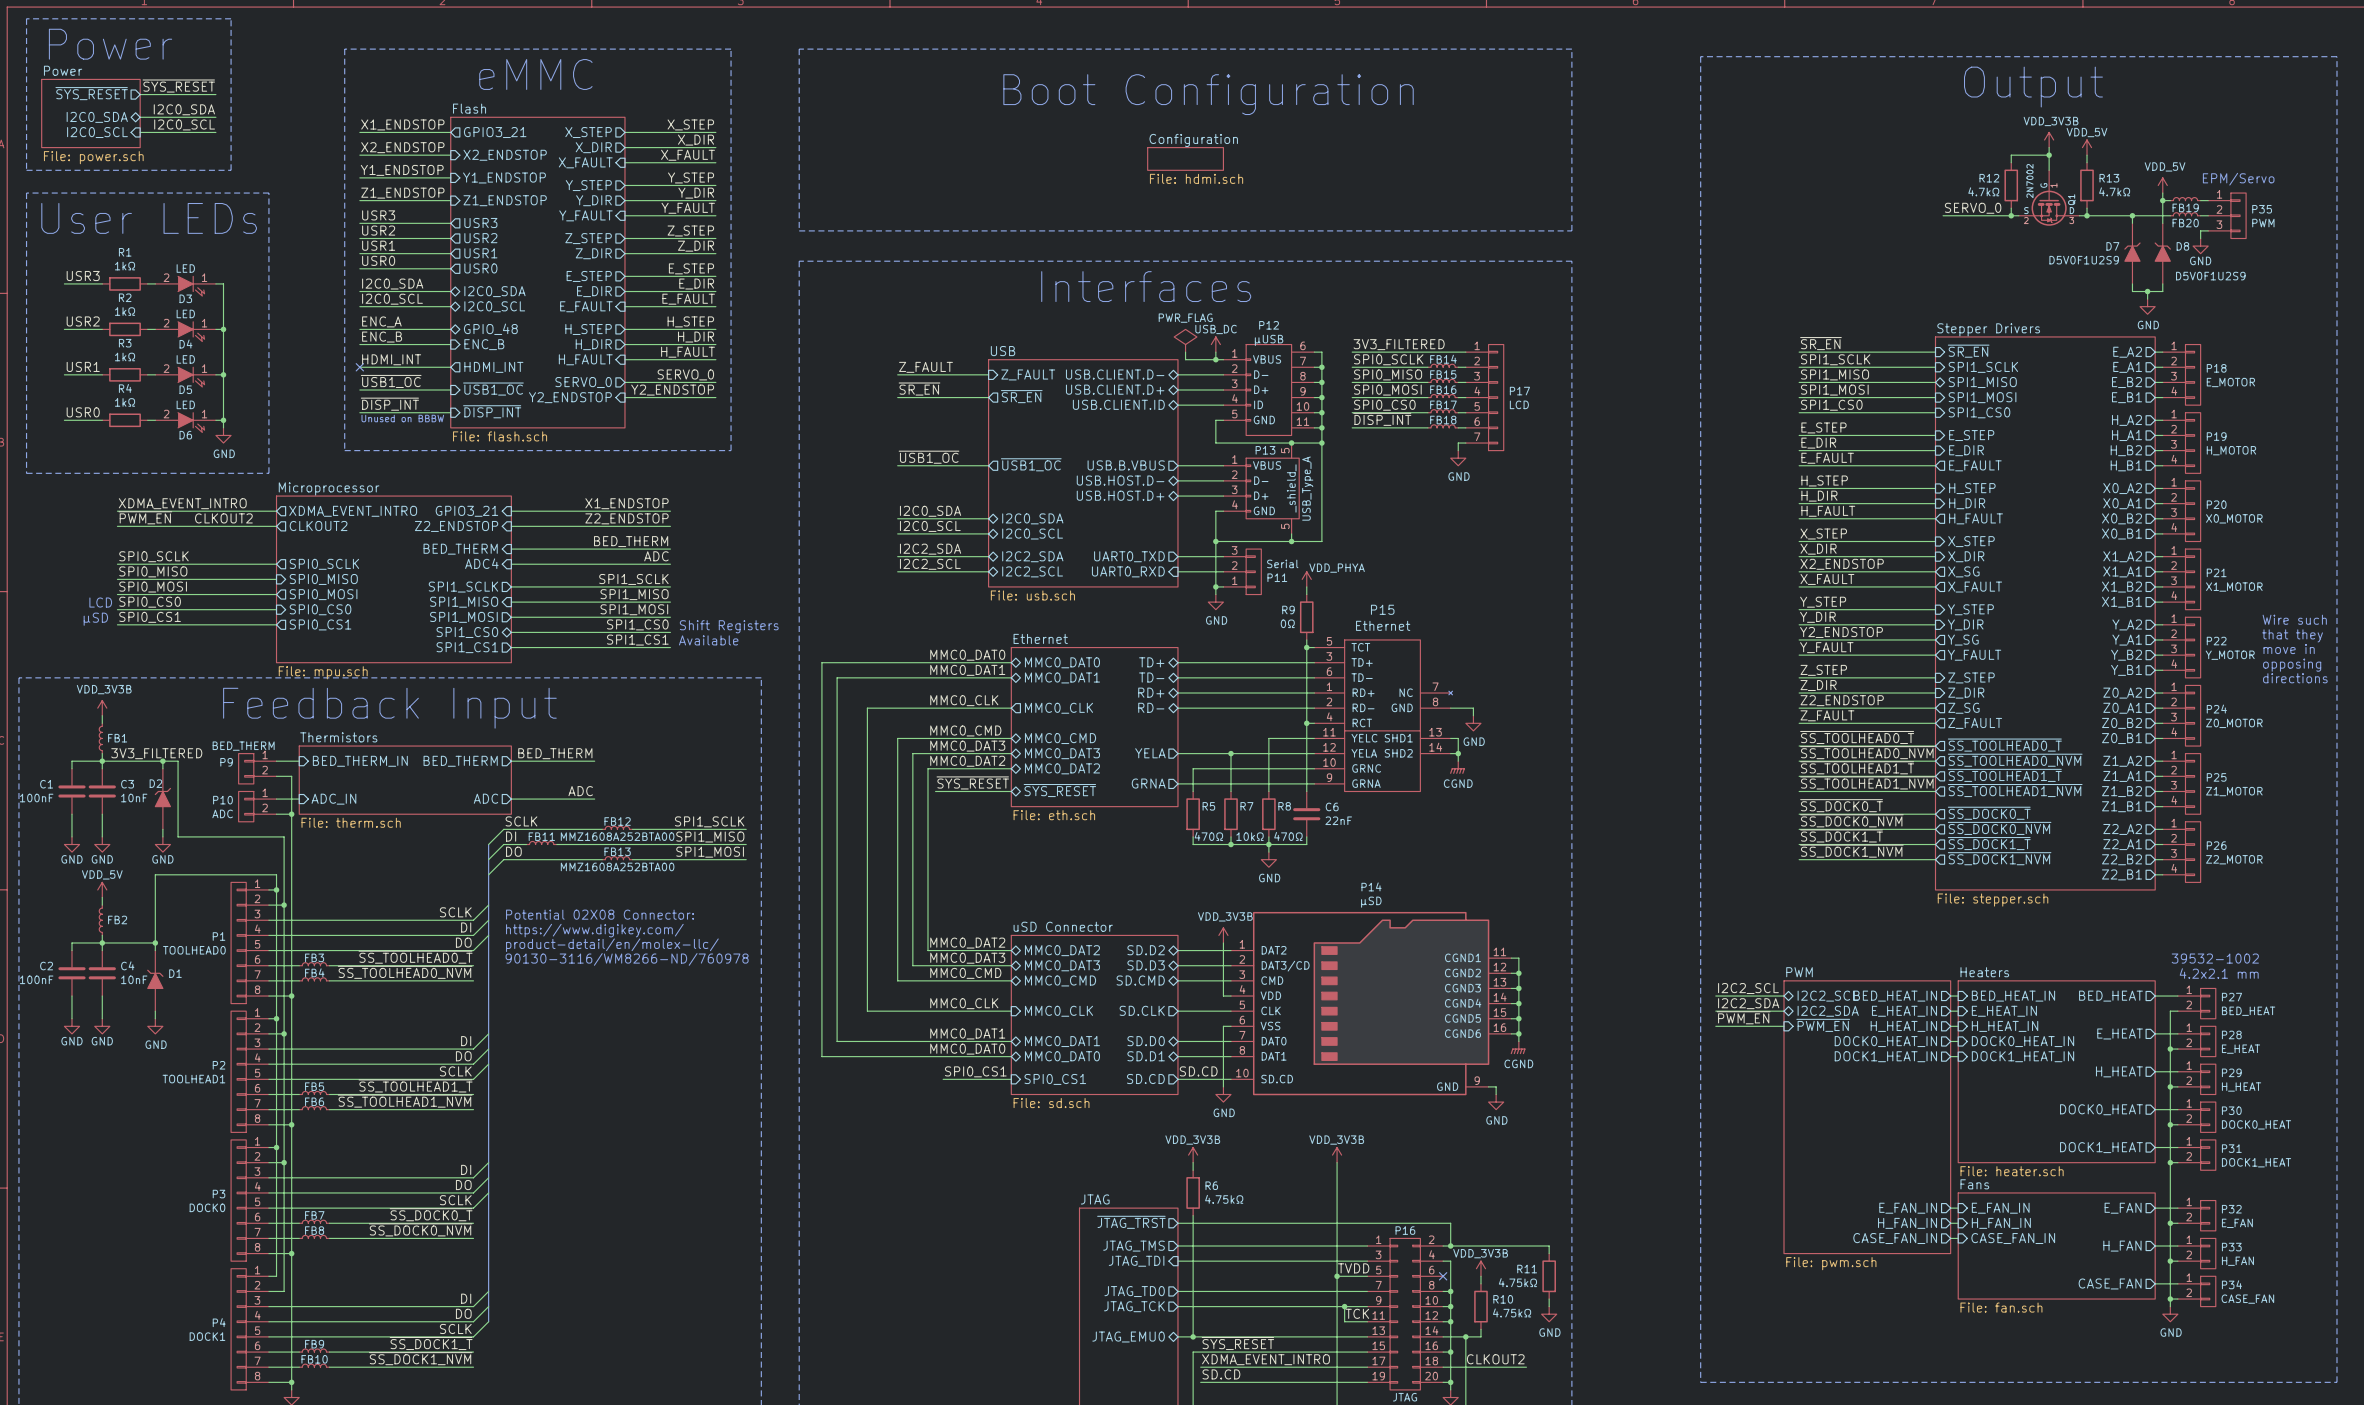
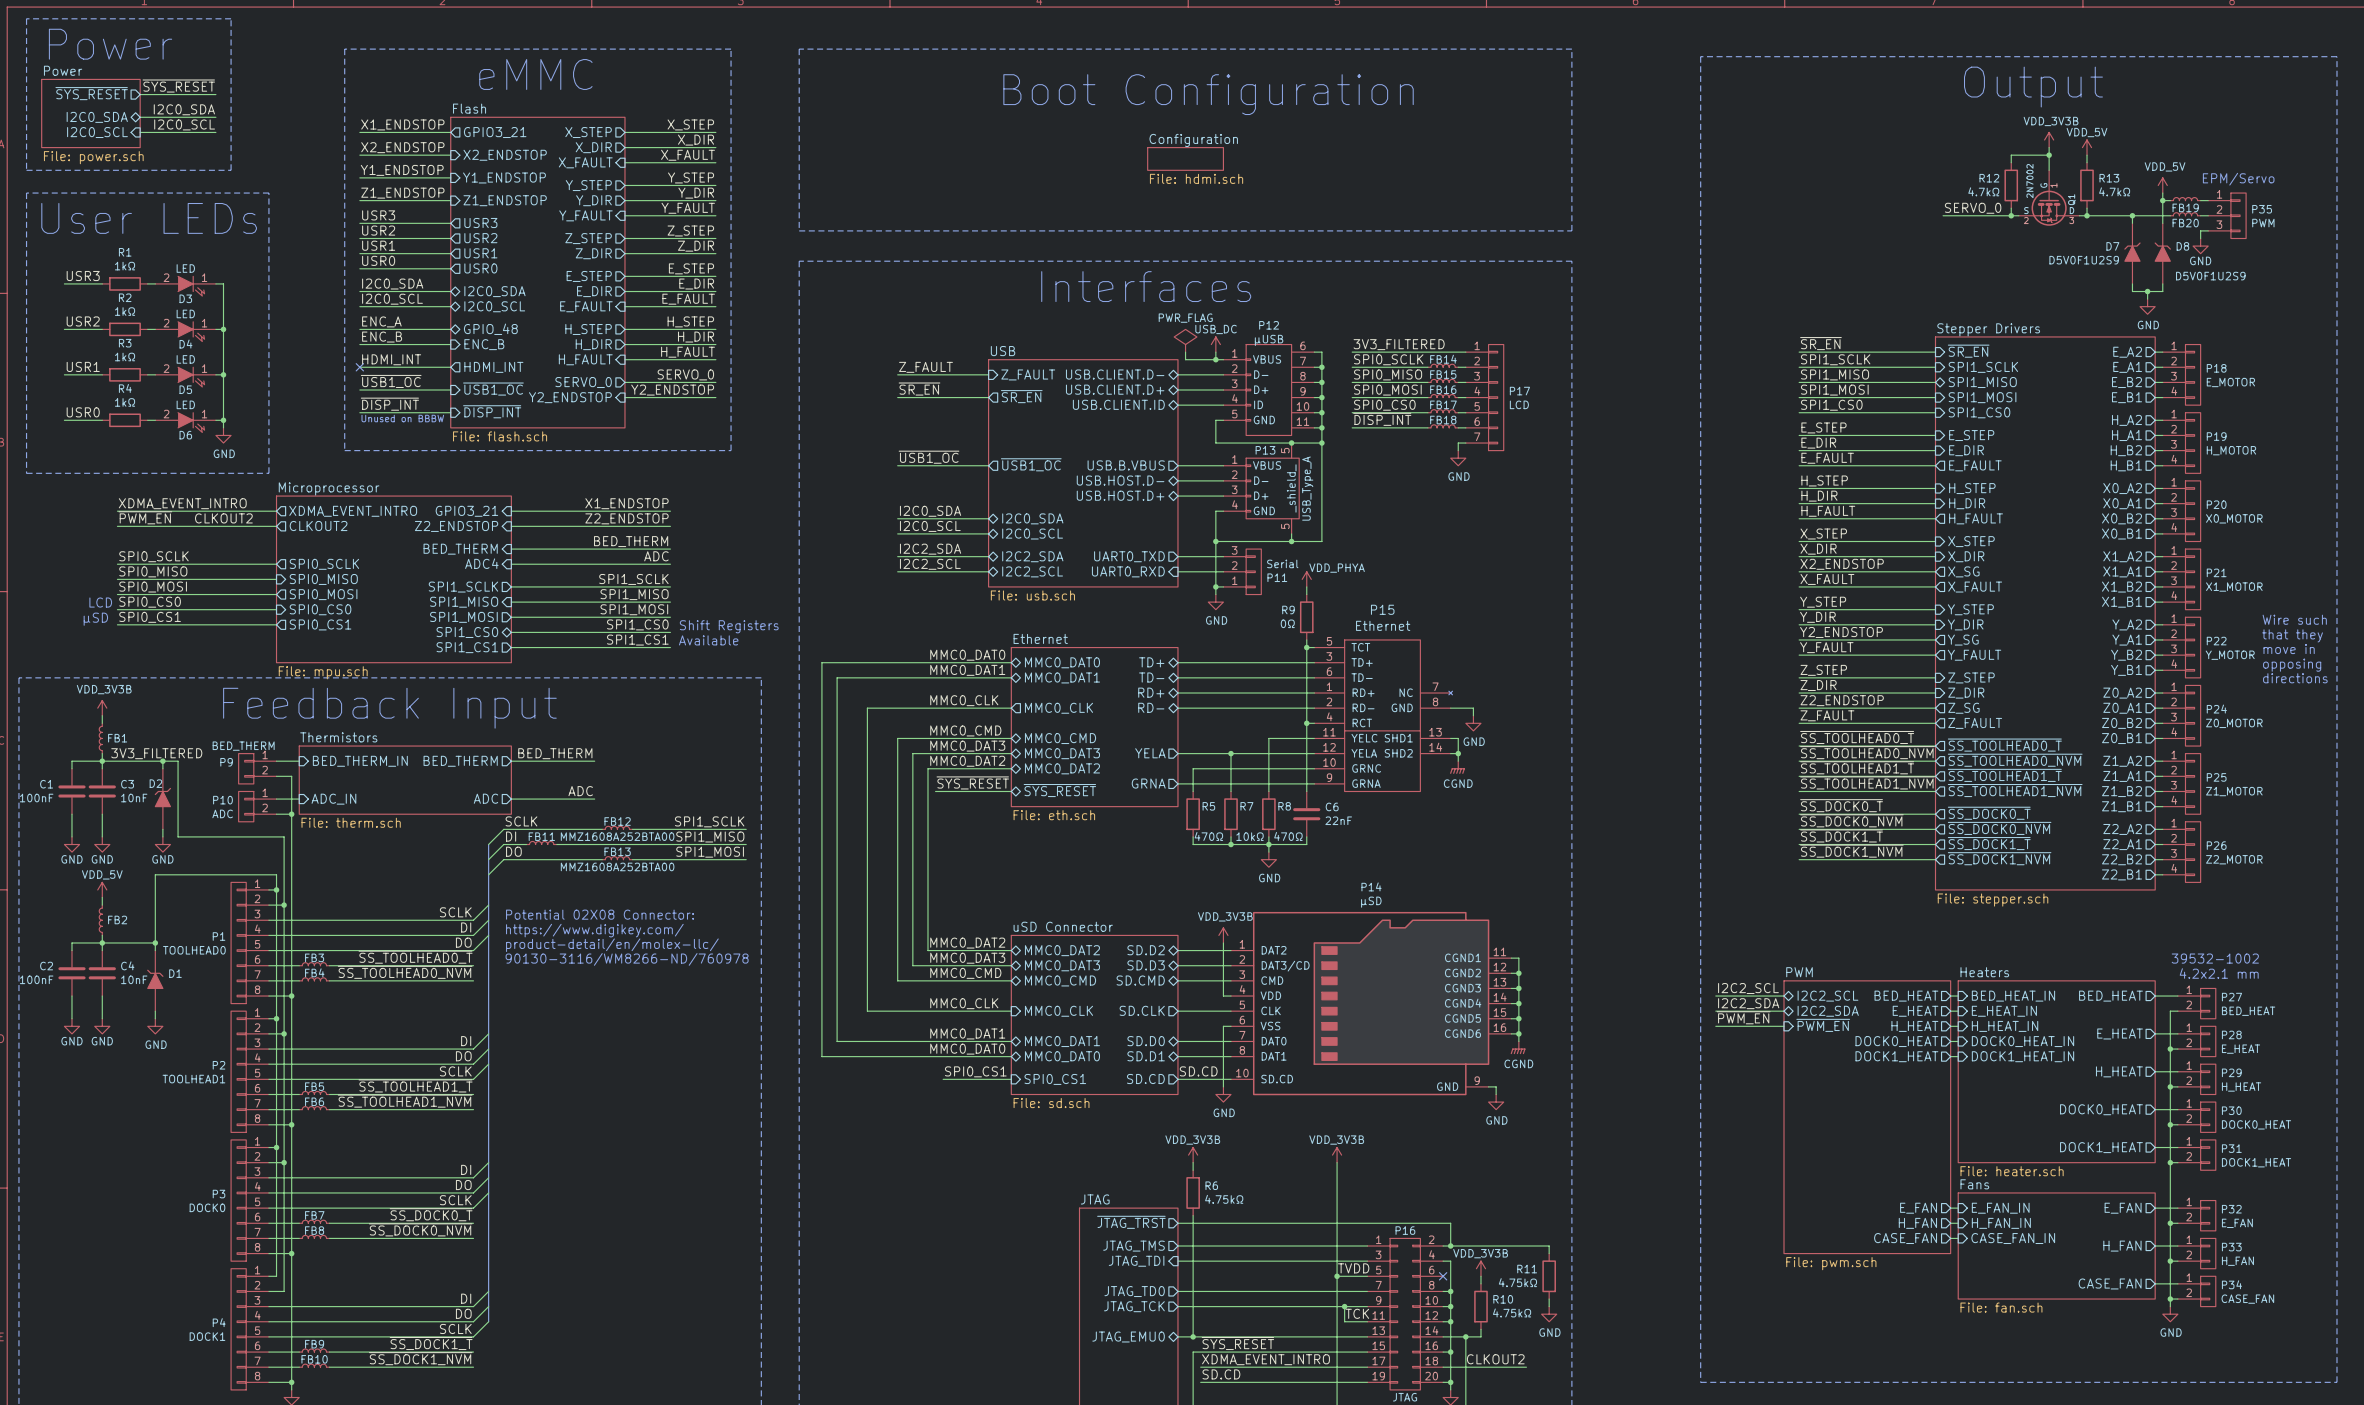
sheet pin: BED_HEAT_IN (1895, 996) -> BED_HEAT (1906, 996)
sheet pin: E_HEAT_IN (1904, 1011) -> E_HEAT (1915, 1011)
sheet pin: H_HEAT_IN (1903, 1026) -> H_HEAT (1914, 1026)
sheet pin: DOCK0_HEAT_IN (1885, 1041) -> DOCK0_HEAT (1896, 1041)
sheet pin: DOCK1_HEAT_IN (1885, 1056) -> DOCK1_HEAT (1896, 1056)
sheet pin: E_FAN_IN (1908, 1208) -> E_FAN (1918, 1208)
sheet pin: H_FAN_IN (1907, 1223) -> H_FAN (1917, 1223)
sheet pin: CASE_FAN_IN (1895, 1238) -> CASE_FAN (1905, 1238)

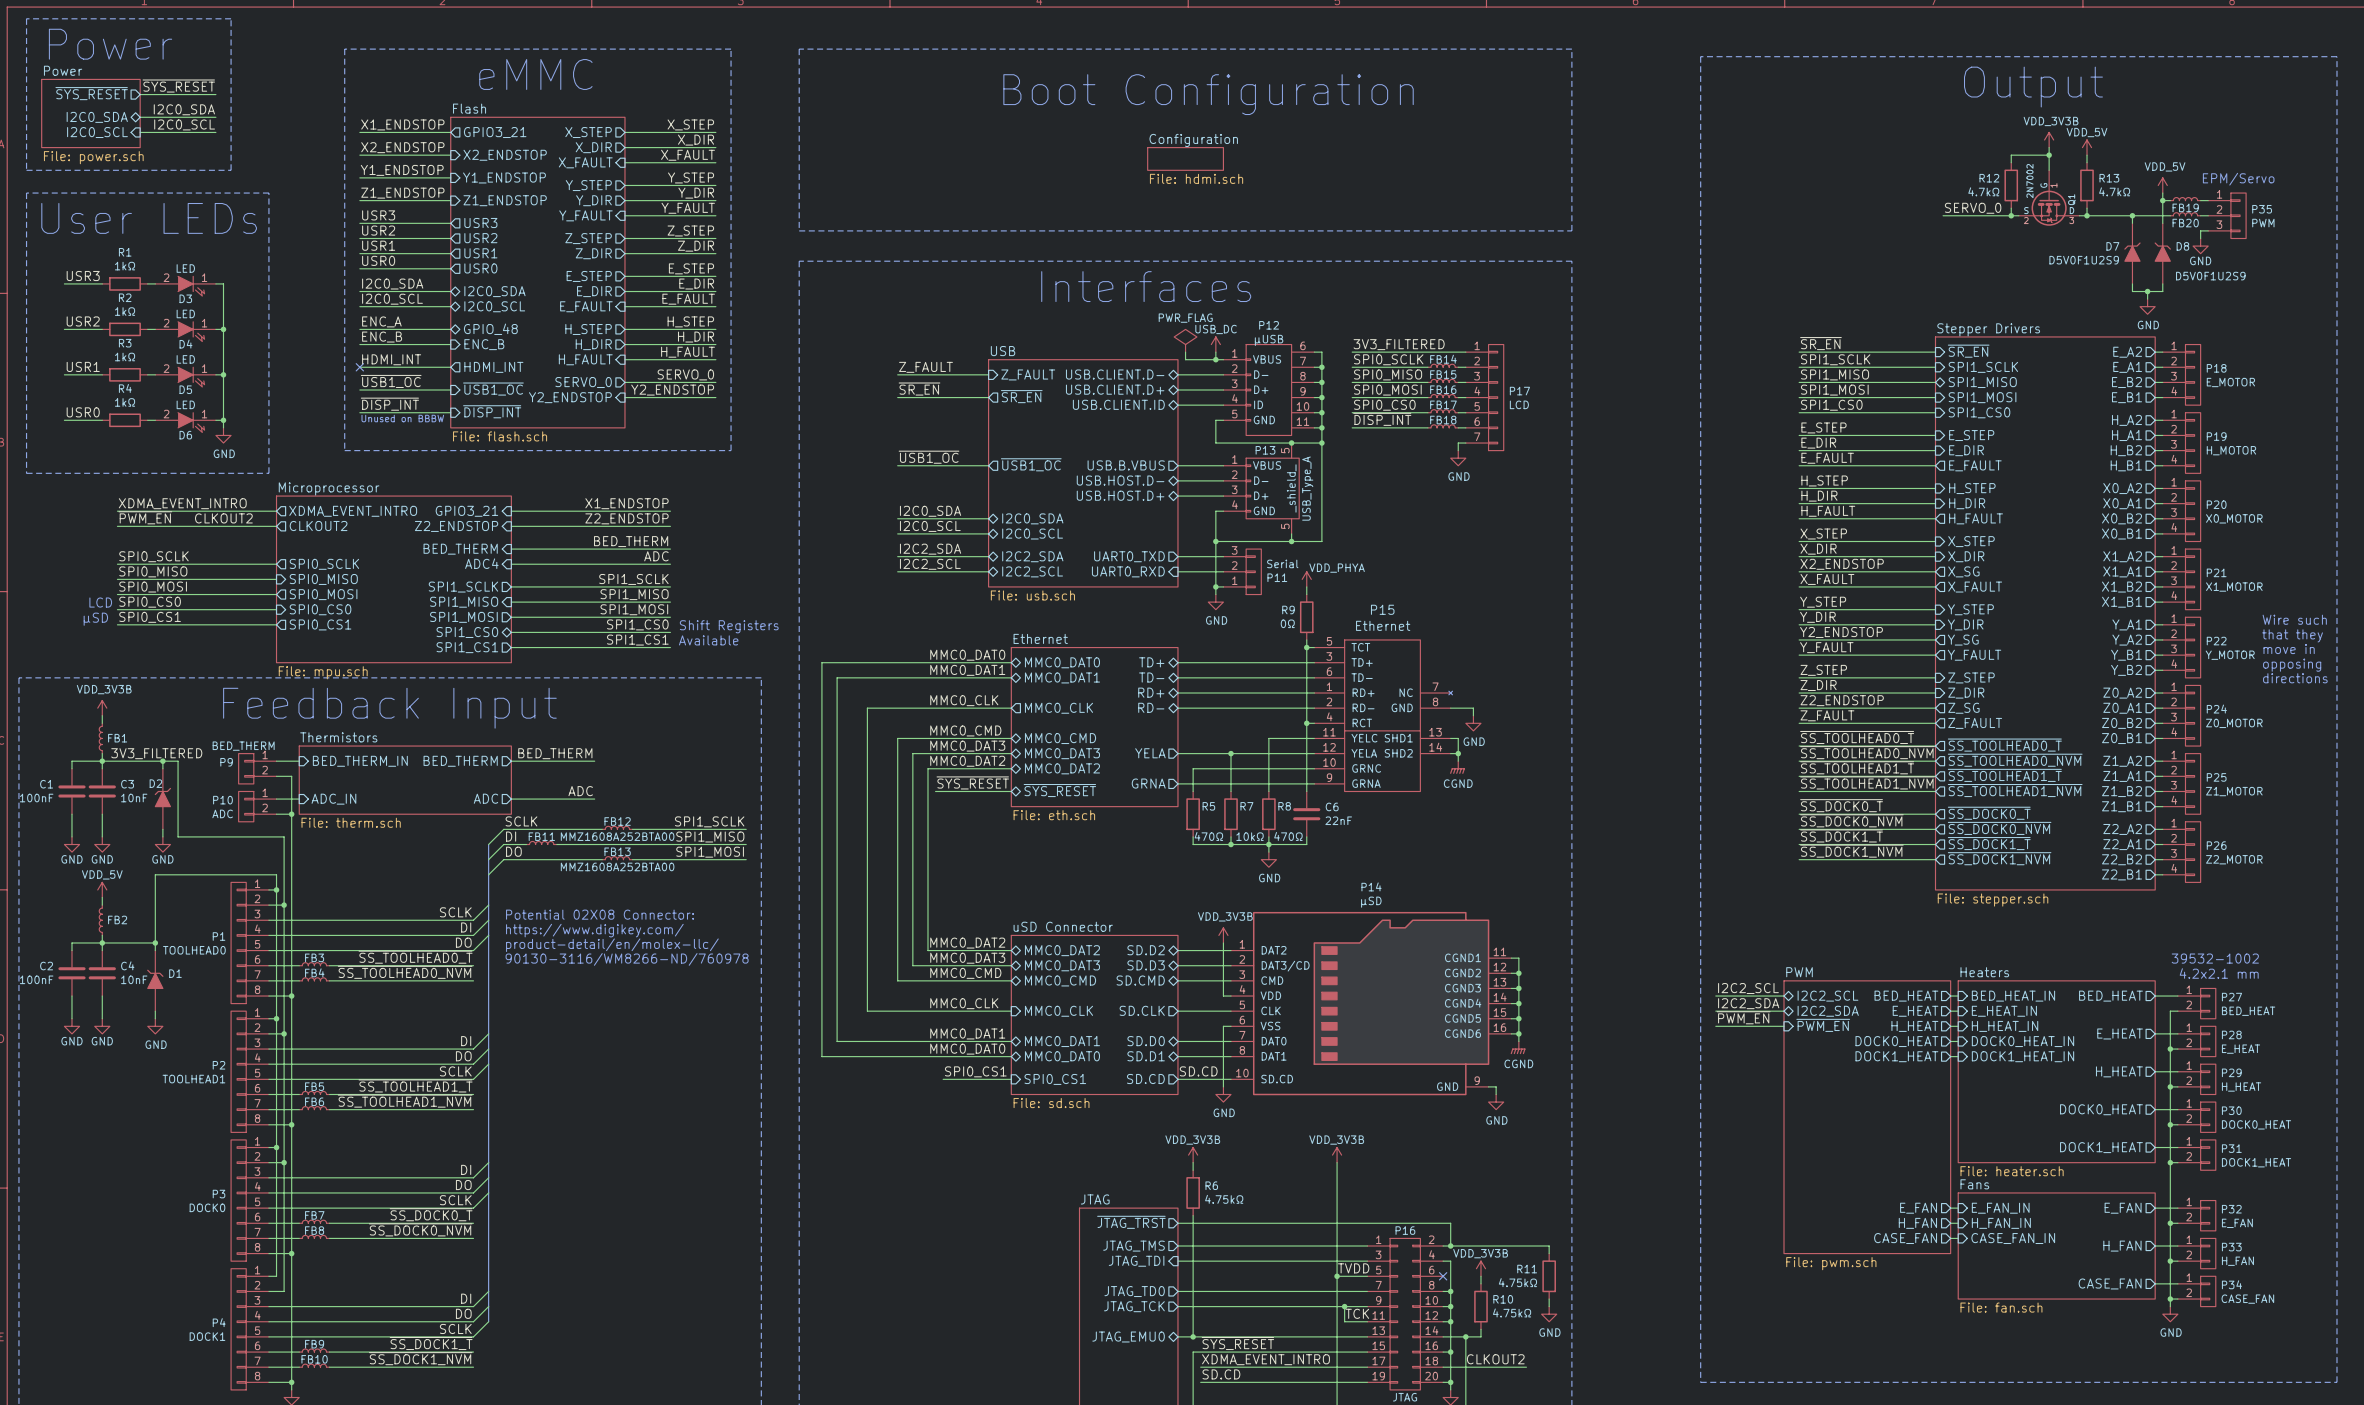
sheet pin: Y_A2 (2127, 624) -> Y_A1 (2127, 624)
sheet pin: Y_A1 (2127, 640) -> Y_A2 (2127, 640)
sheet pin: Y_B2 (2126, 655) -> Y_B1 (2126, 655)
sheet pin: Y_B1 (2126, 670) -> Y_B2 (2126, 670)

